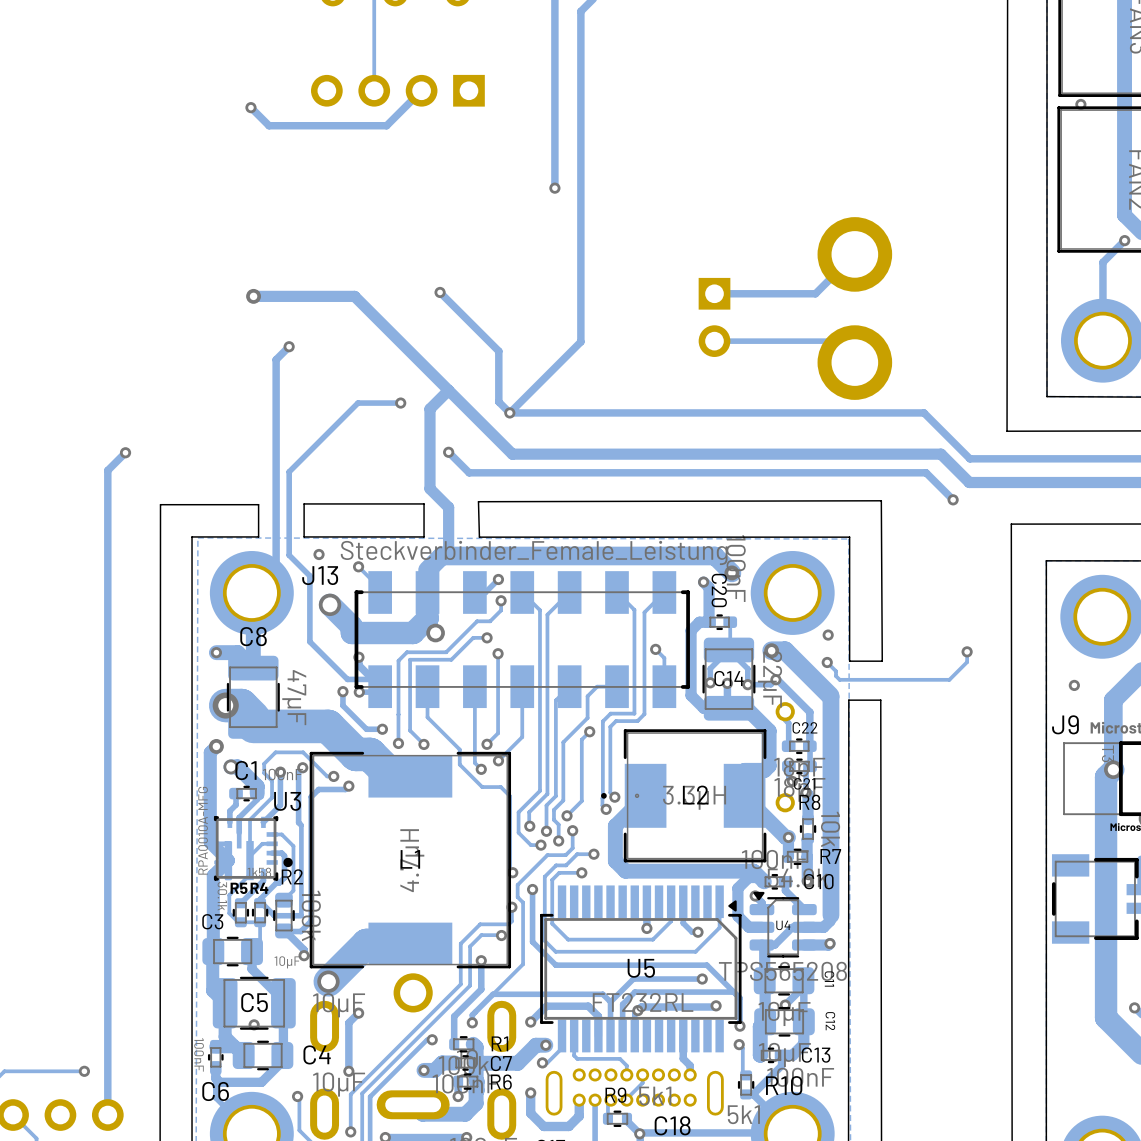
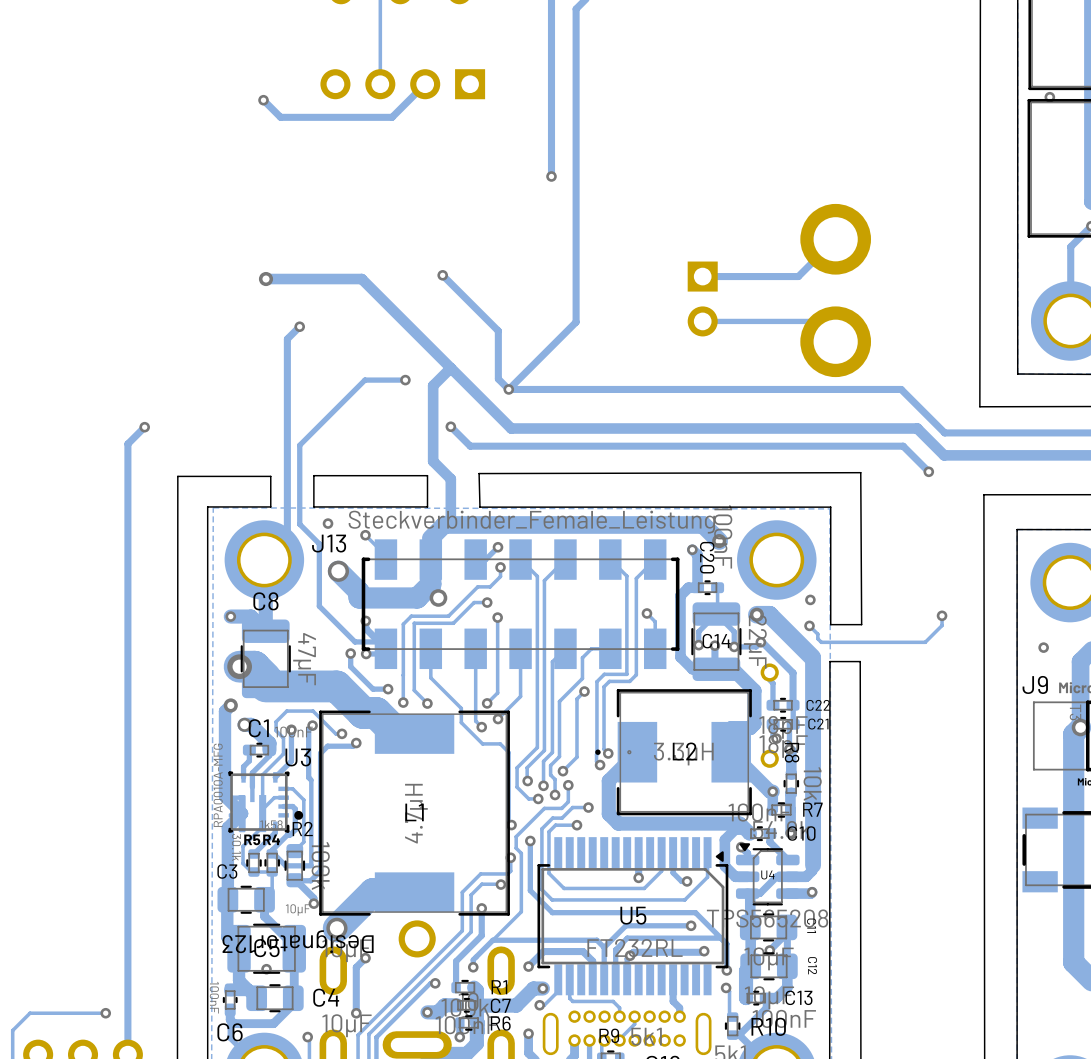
C22 name position: C22 (804, 727) -> C22 (818, 705)
C21 name position: C21 (804, 783) -> C21 (818, 724)
R8 name rotation: 0° (809, 802) -> 90° clockwise (792, 752)
U3 text: none -> Designator123 (298, 941)

